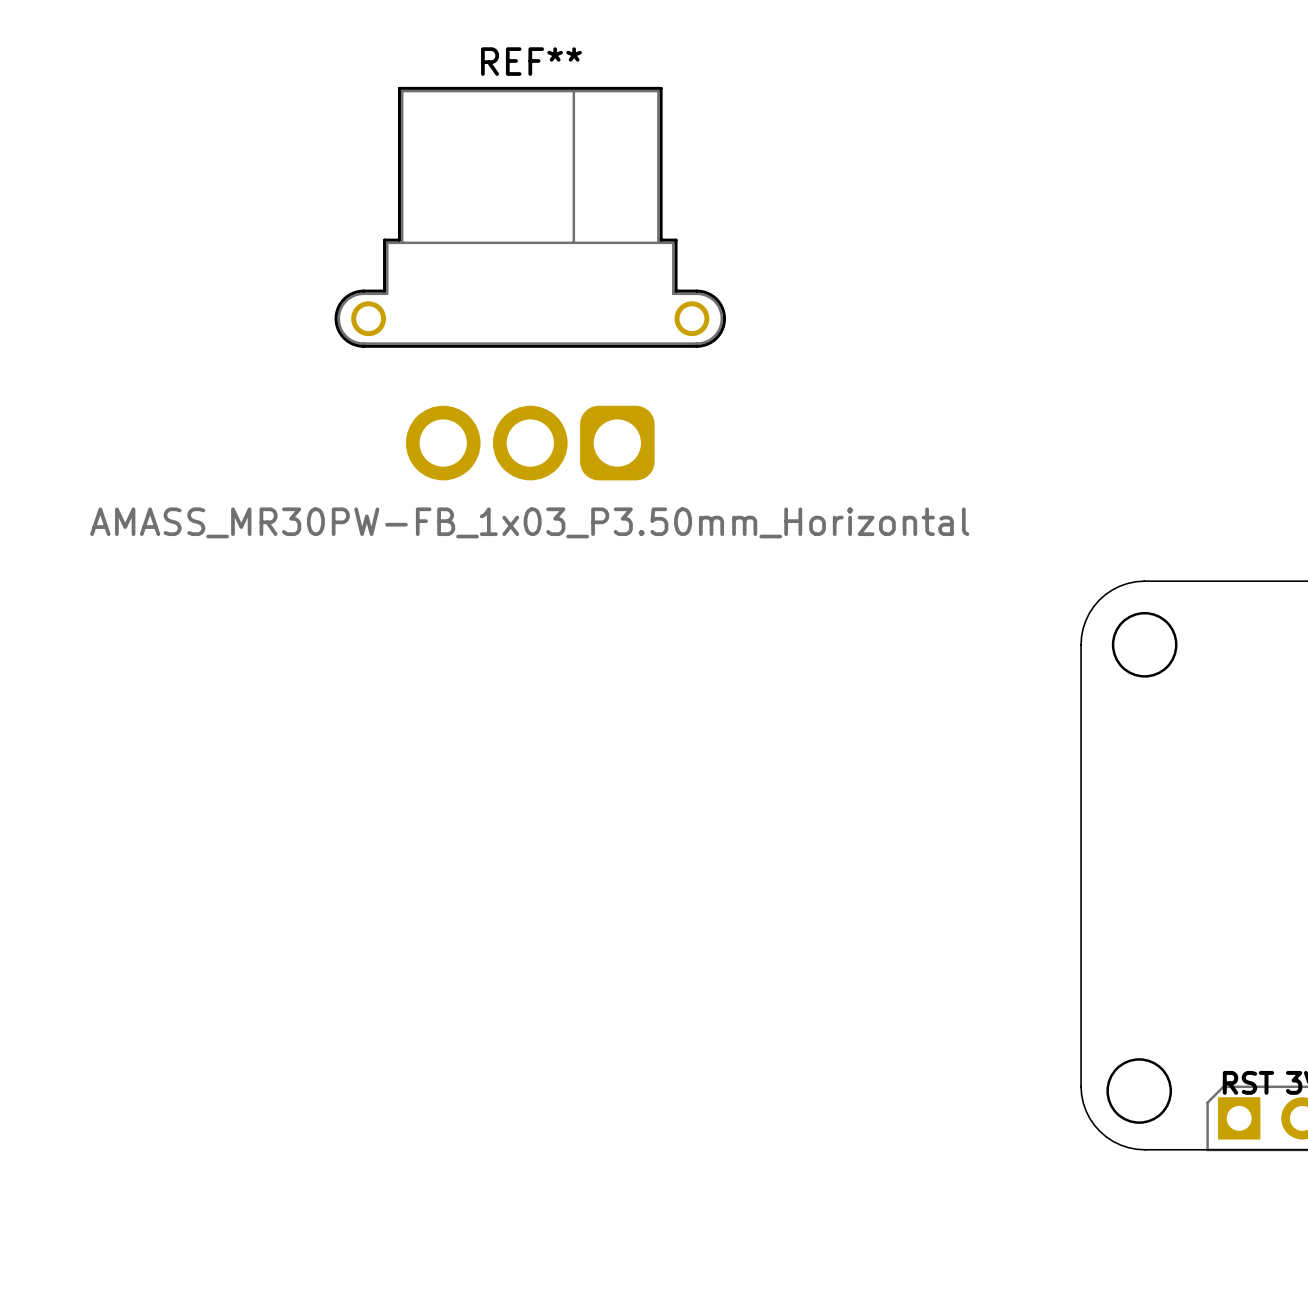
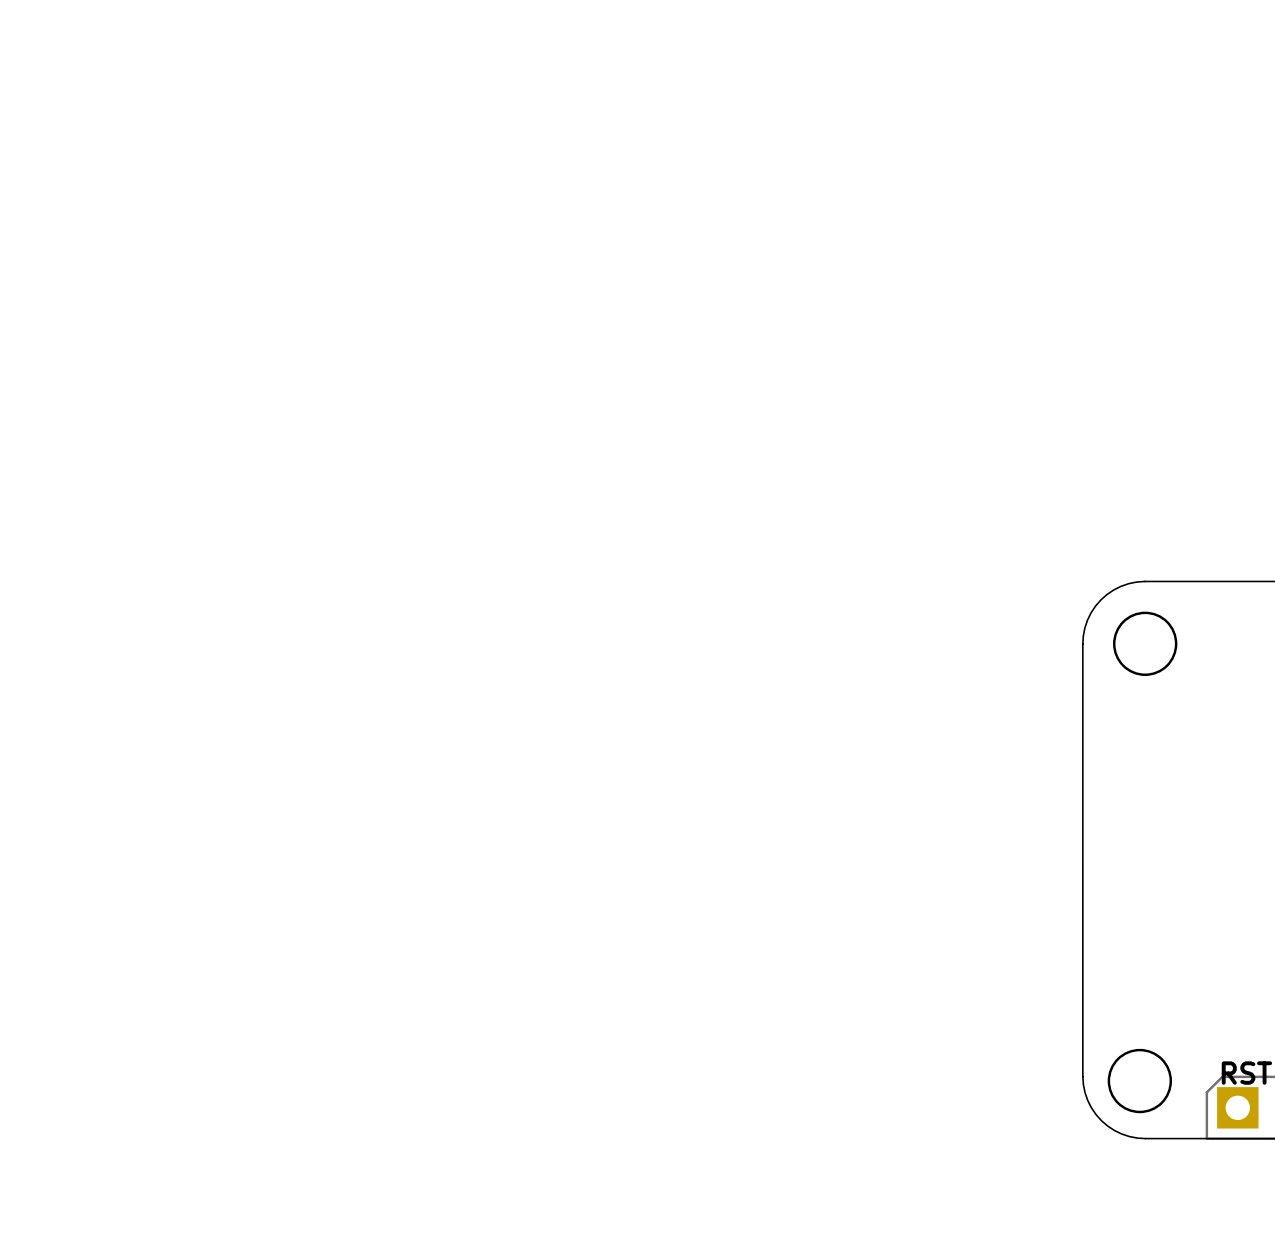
REF**: AMASS_MR30PW-FB_1x03_P3.50mm_Horizontal (530, 283) -> none

